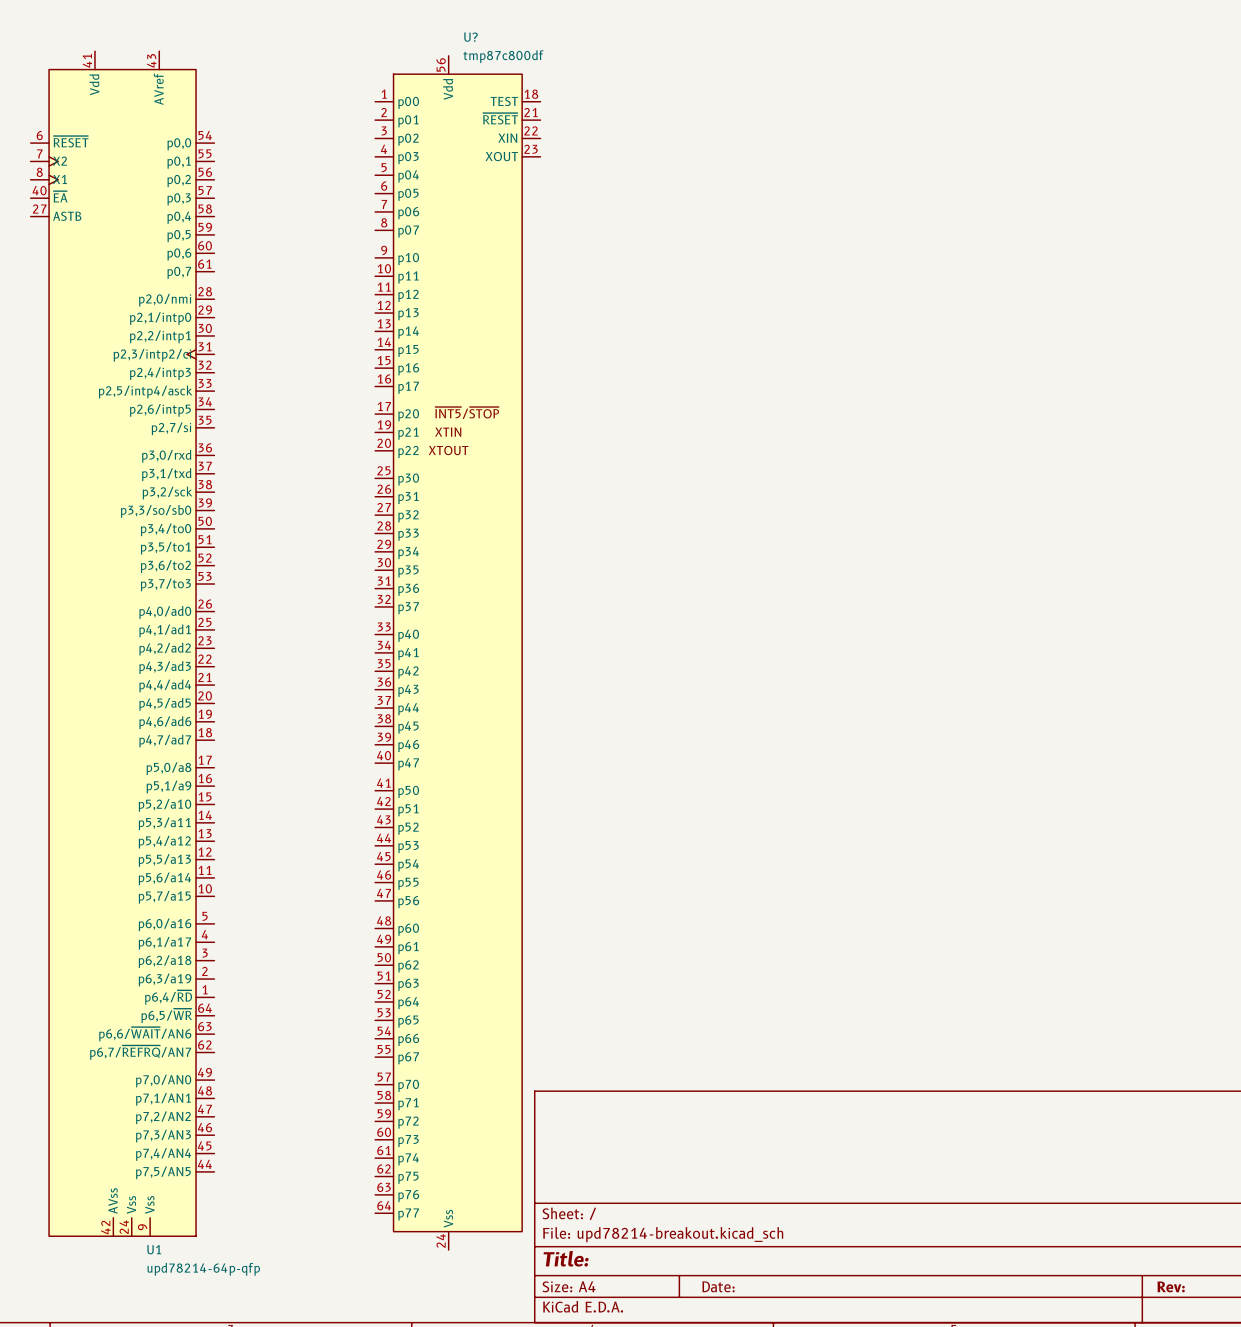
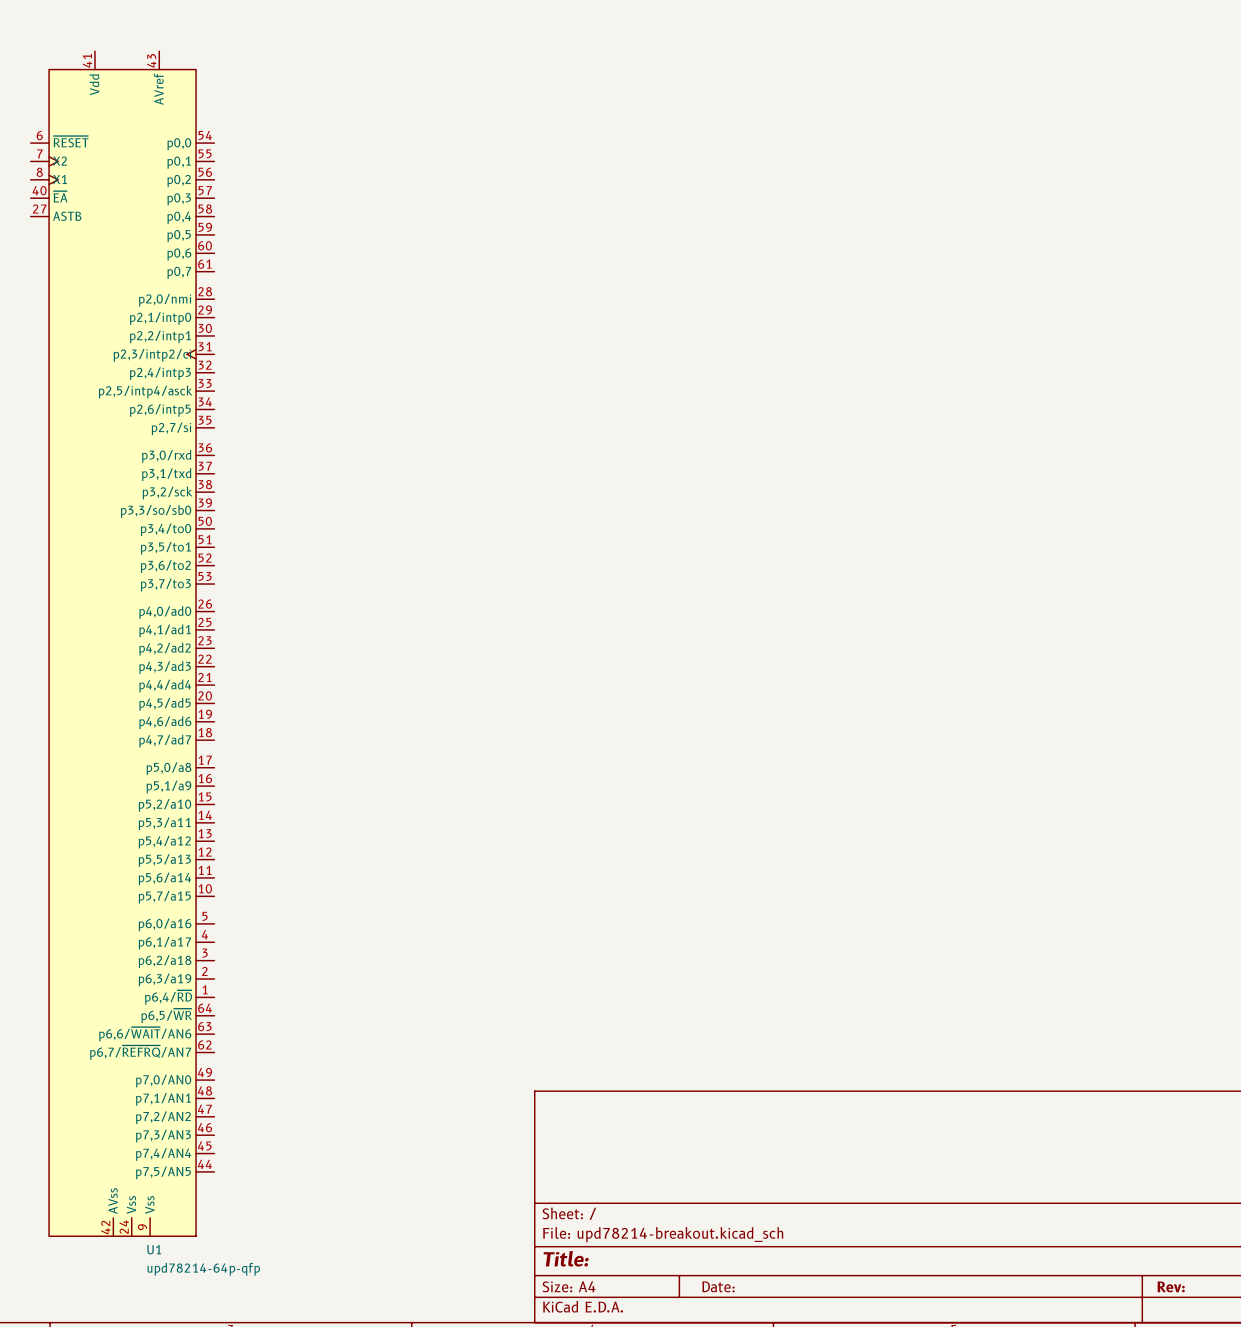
U?: tmp87c800df (457, 652) -> none

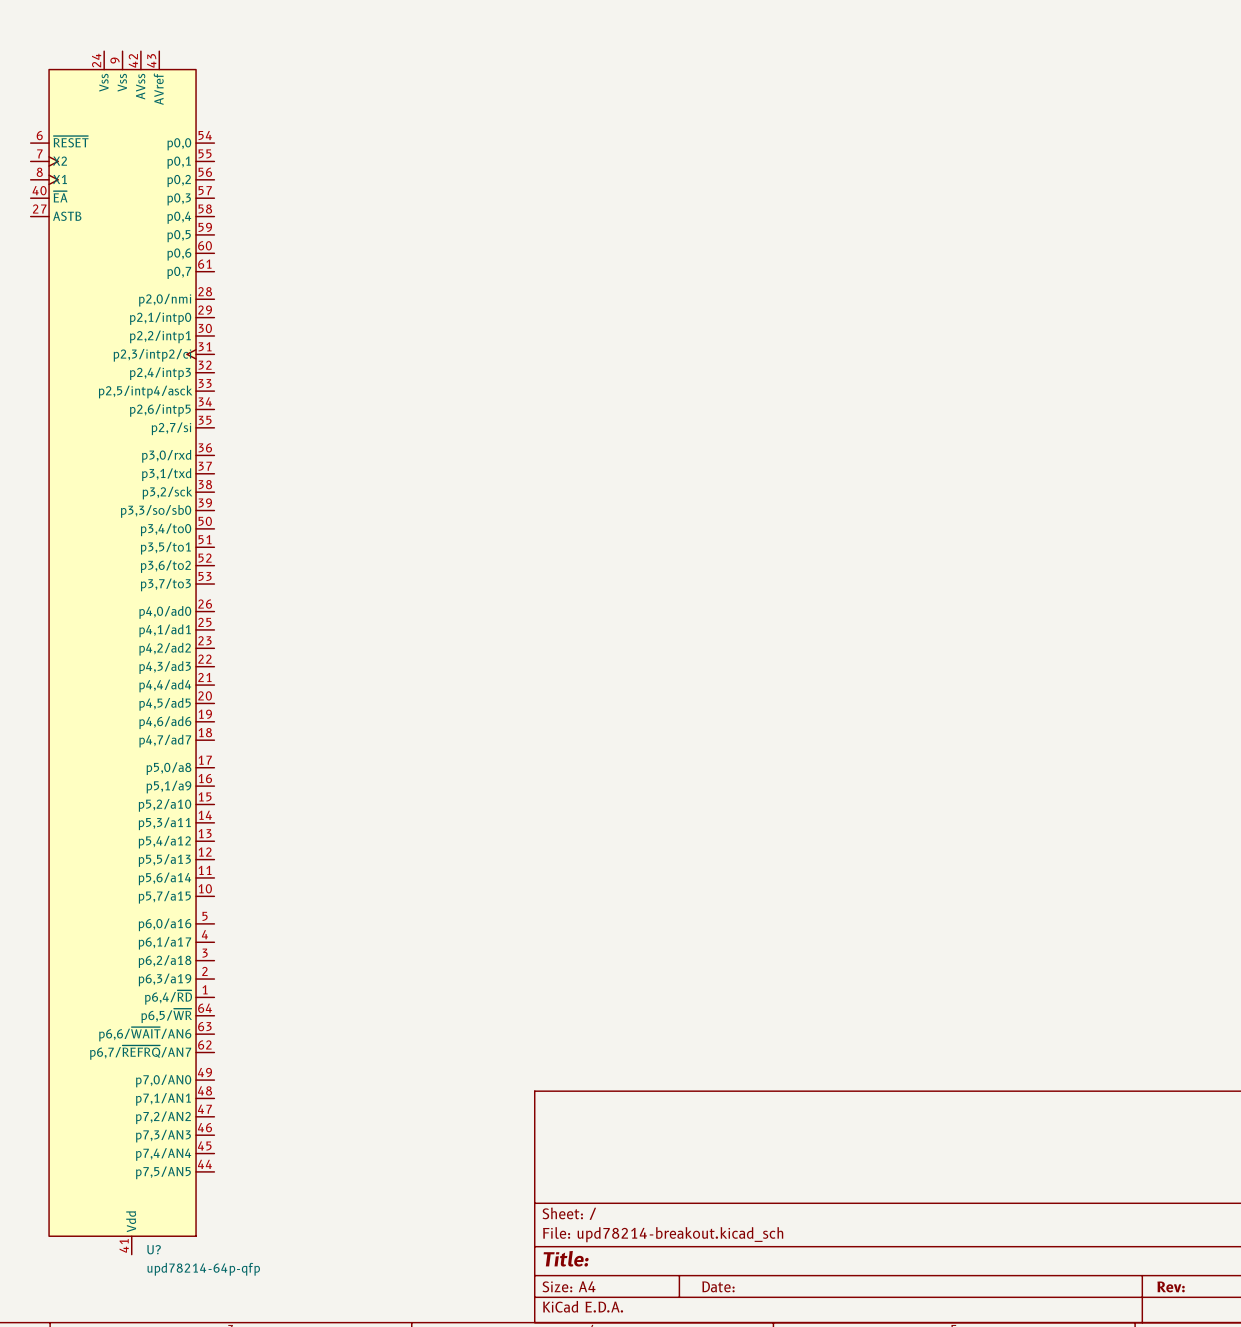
U1: upd78214-64p-qfp (122, 643) -> none
U?: none -> upd78214-64p-qfp (122, 652)

